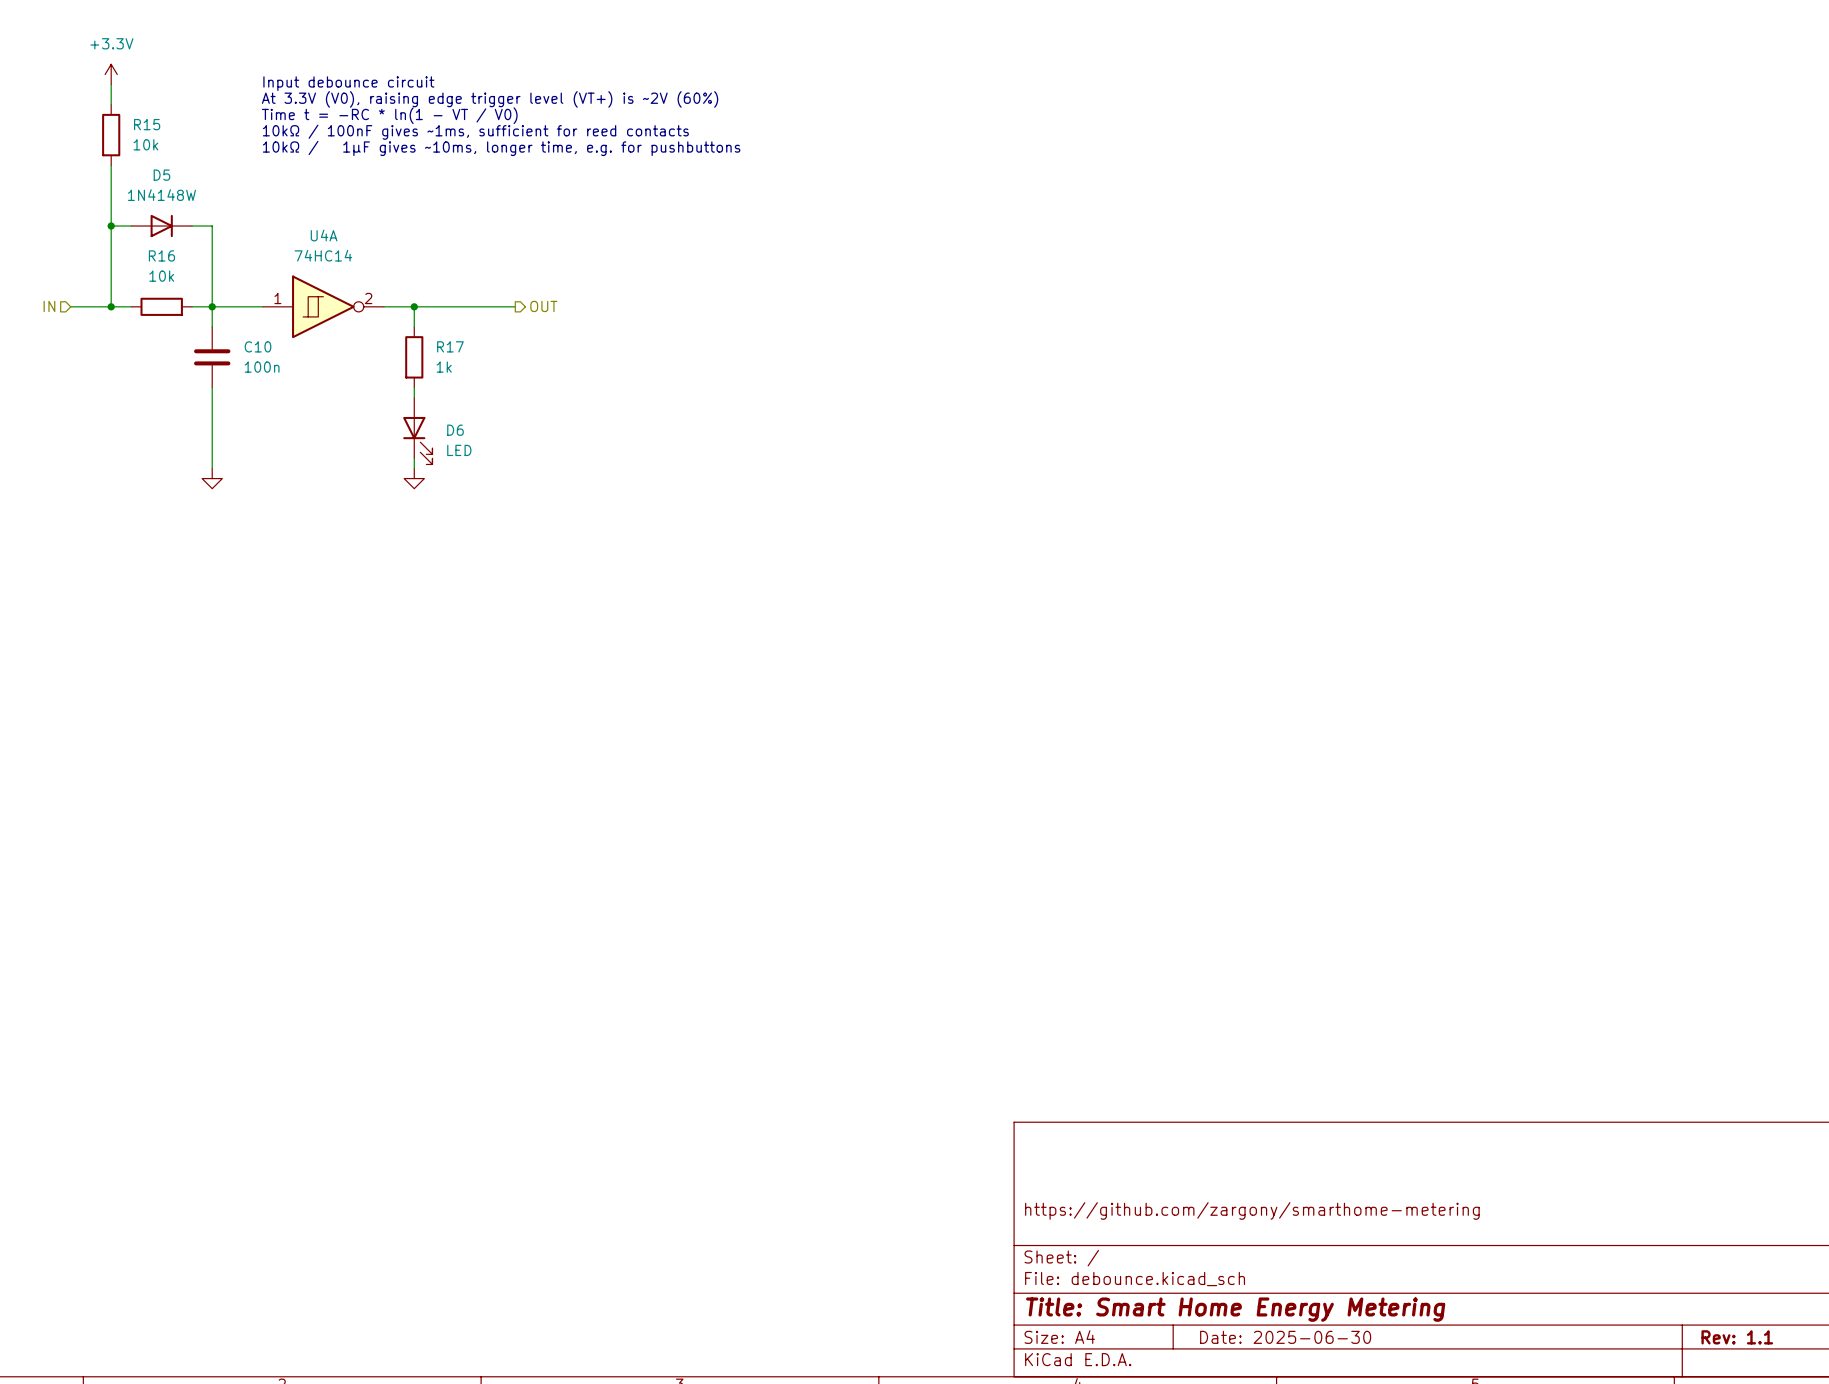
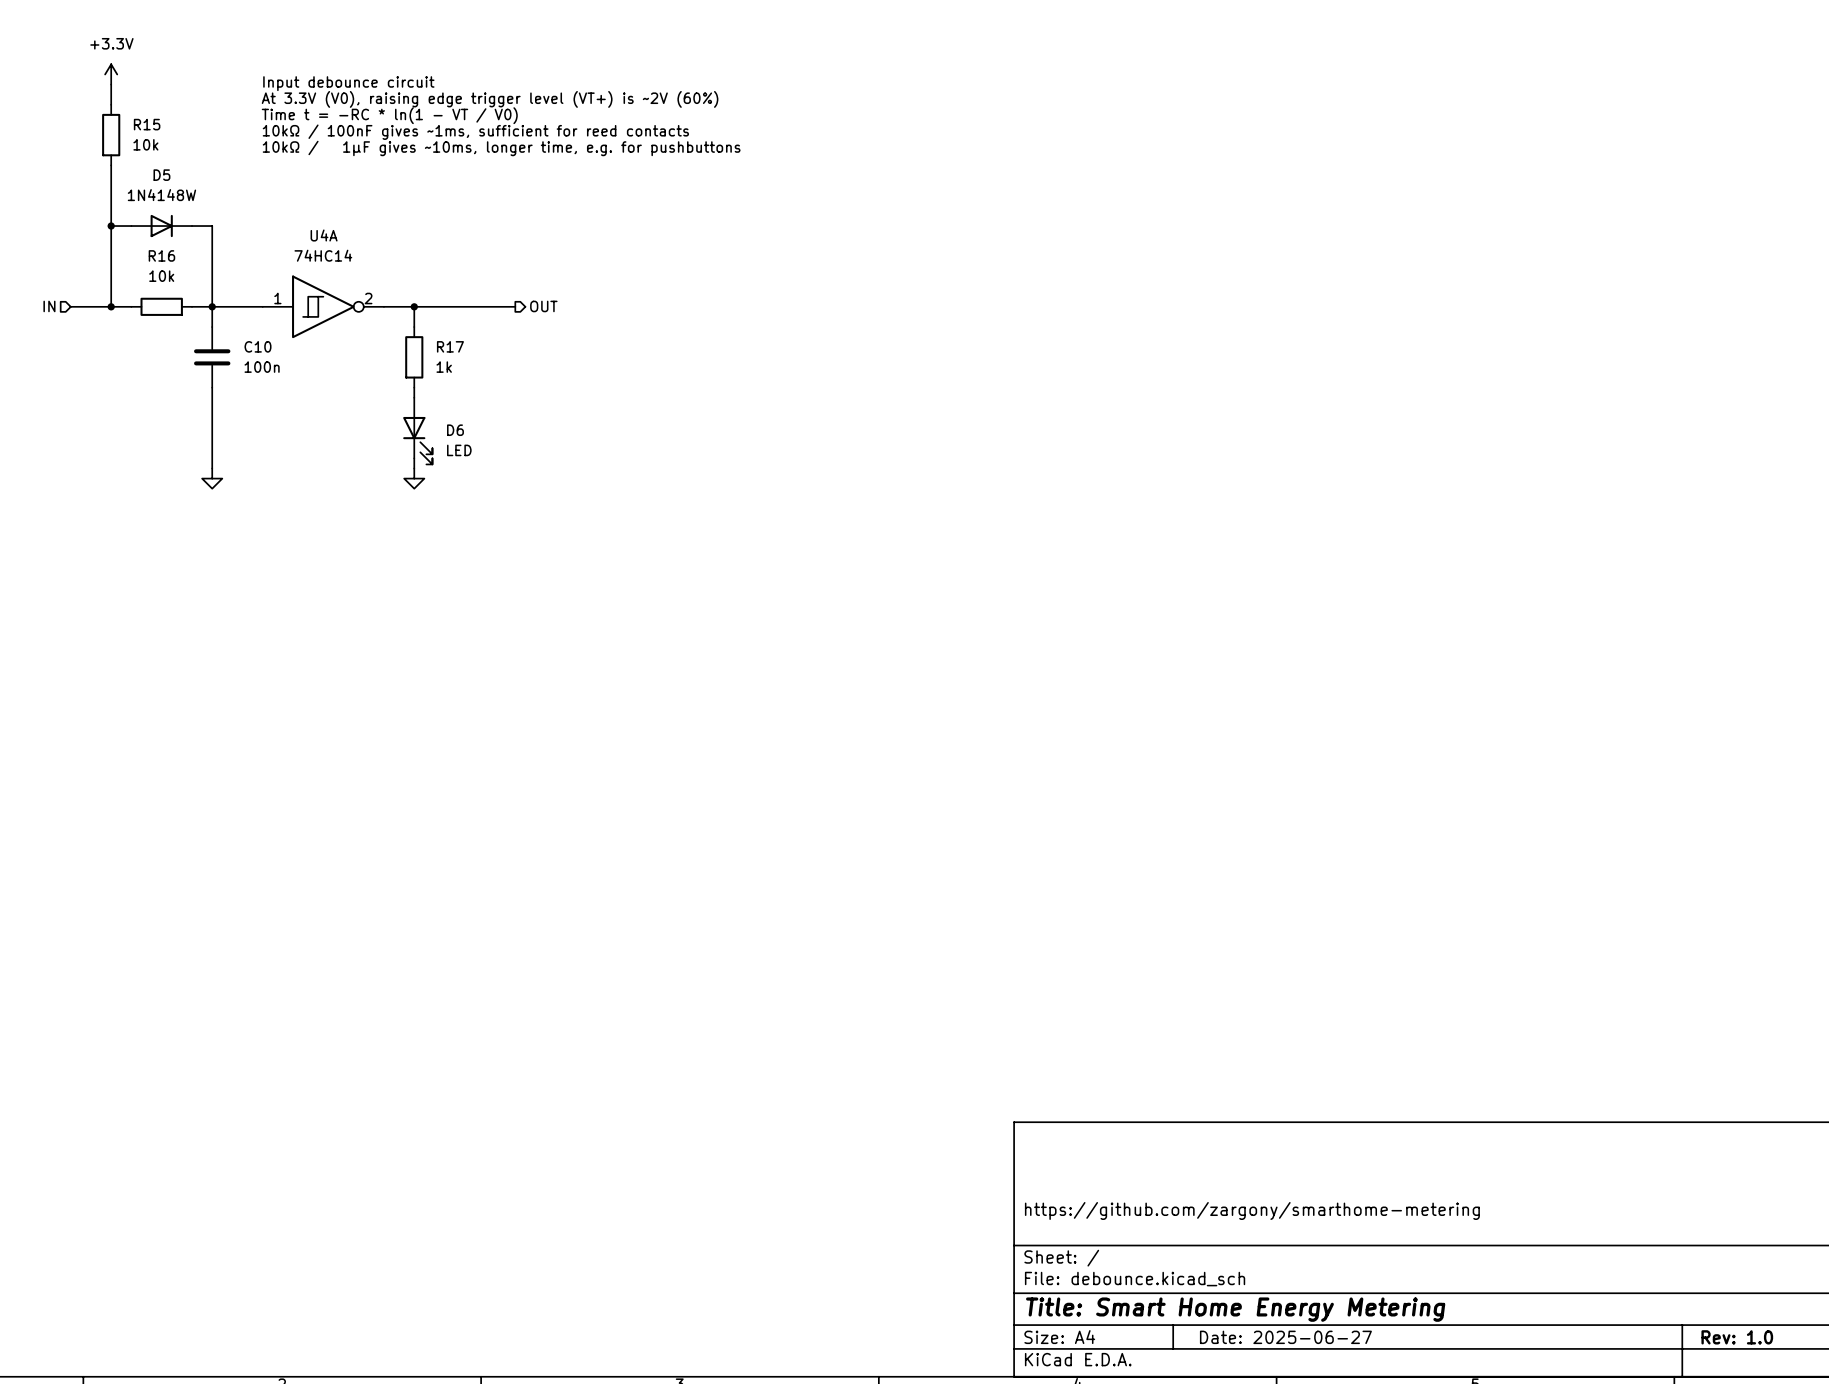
title block: Date: 2025-06-30 (1285, 1337) -> Date: 2025-06-27 (1285, 1337)
title block: Rev: 1.1 (1737, 1337) -> Rev: 1.0 (1737, 1337)

